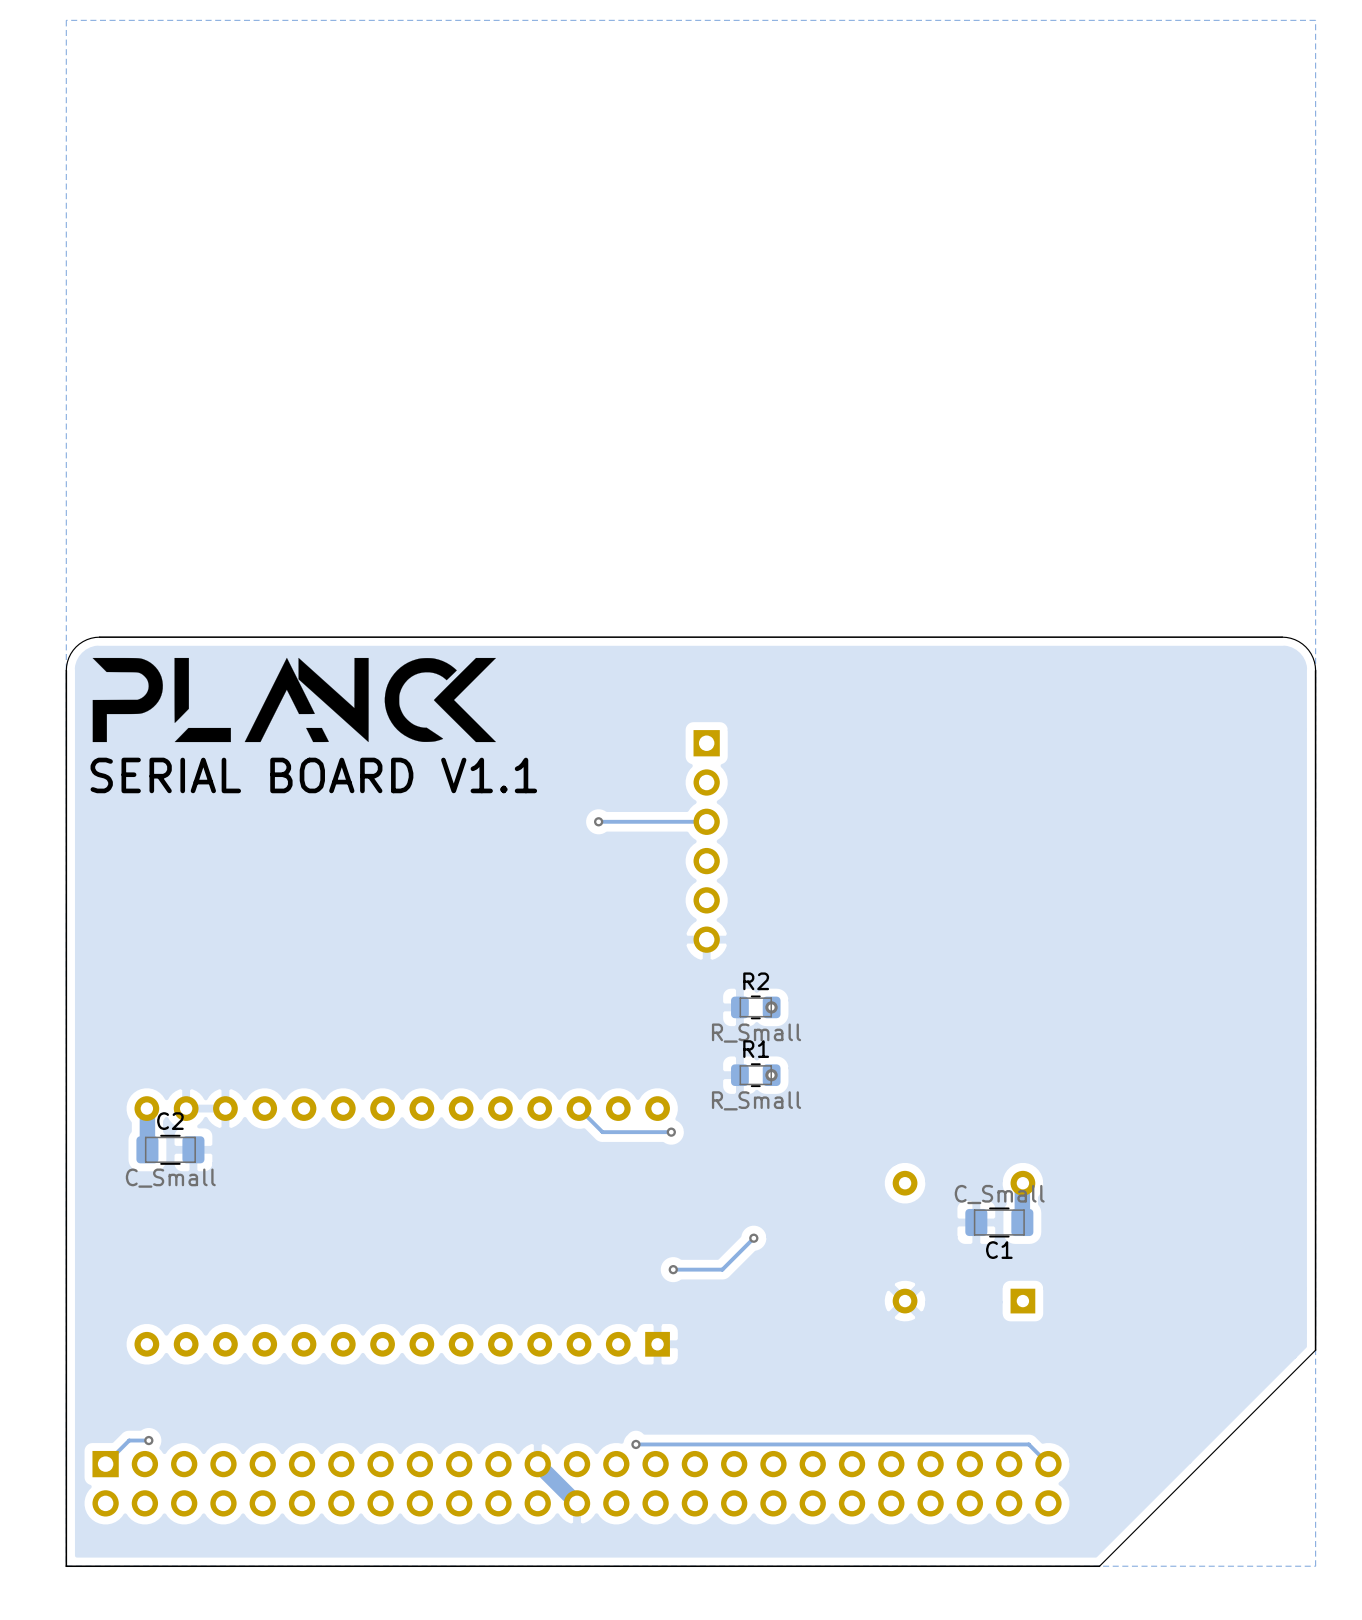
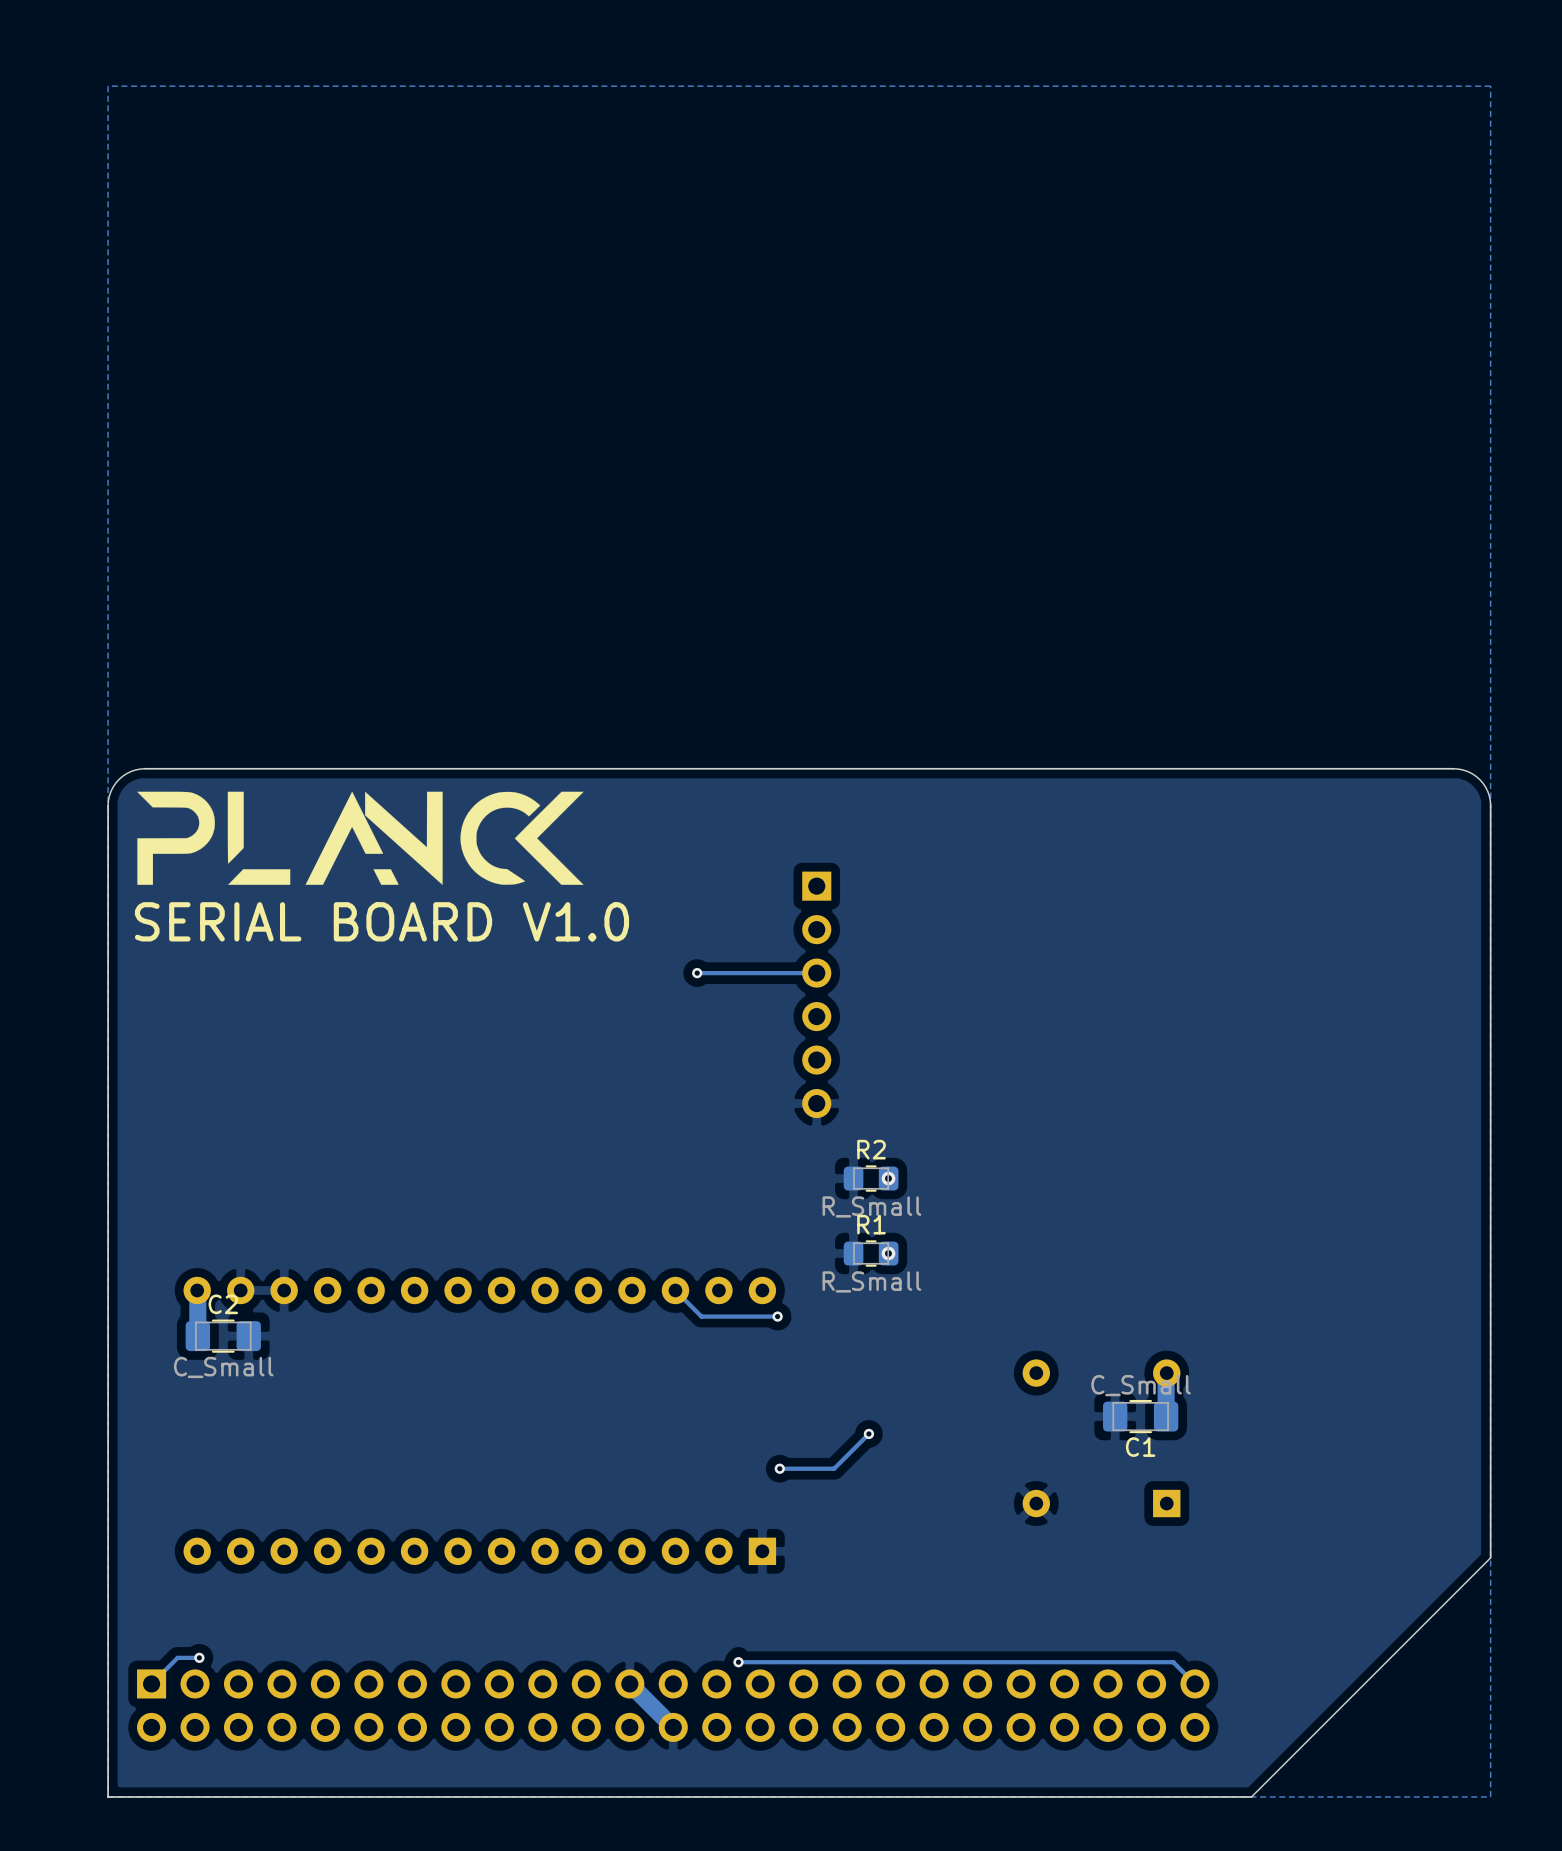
text: SERIAL BOARD V1.1 (313, 775) -> SERIAL BOARD V1.0 (381, 921)

